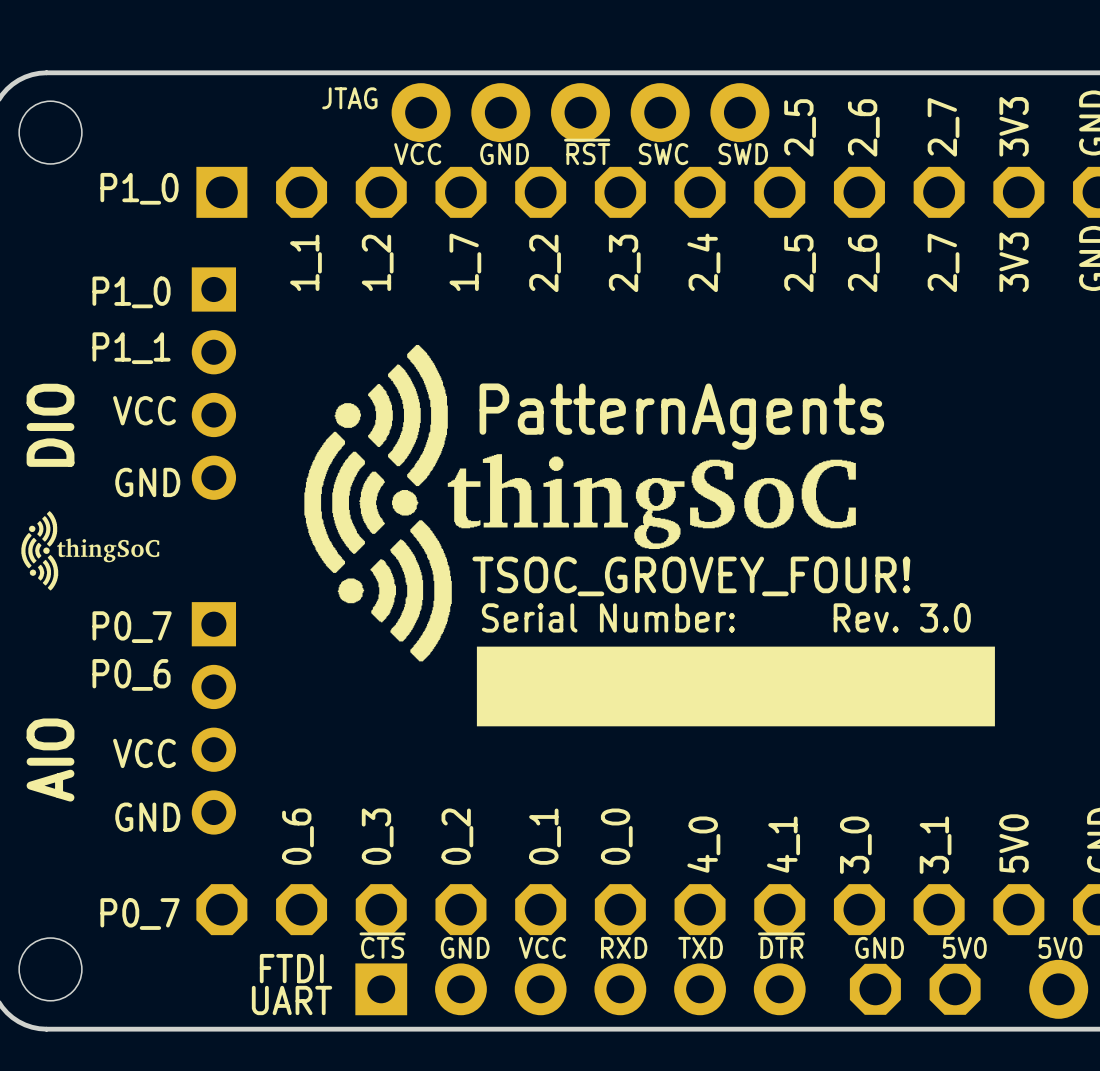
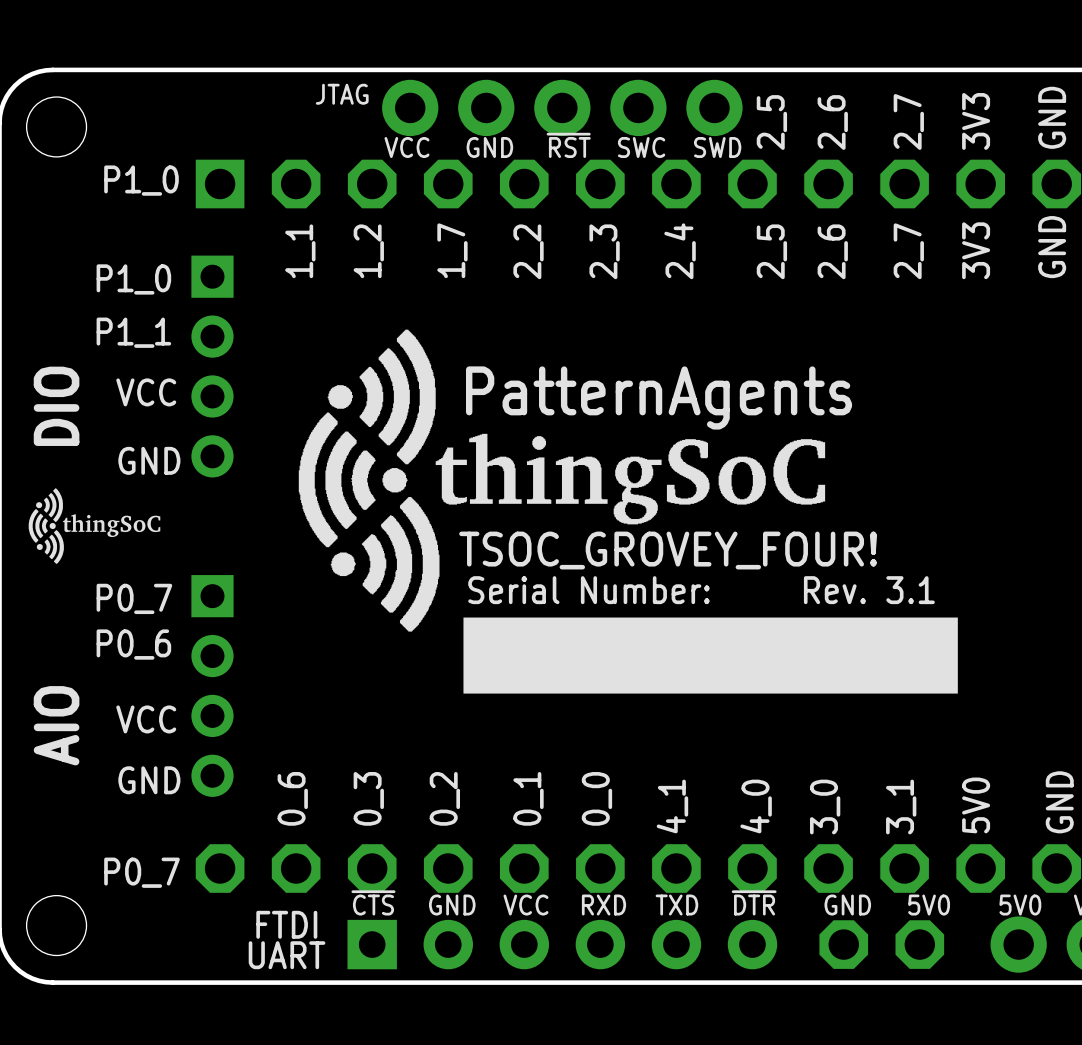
text: Rev. 3.0 (902, 617) -> Rev. 3.1 (869, 590)
text: 4_0 (703, 844) -> 4_1 (672, 806)
text: 4_1 (783, 844) -> 4_0 (756, 806)

